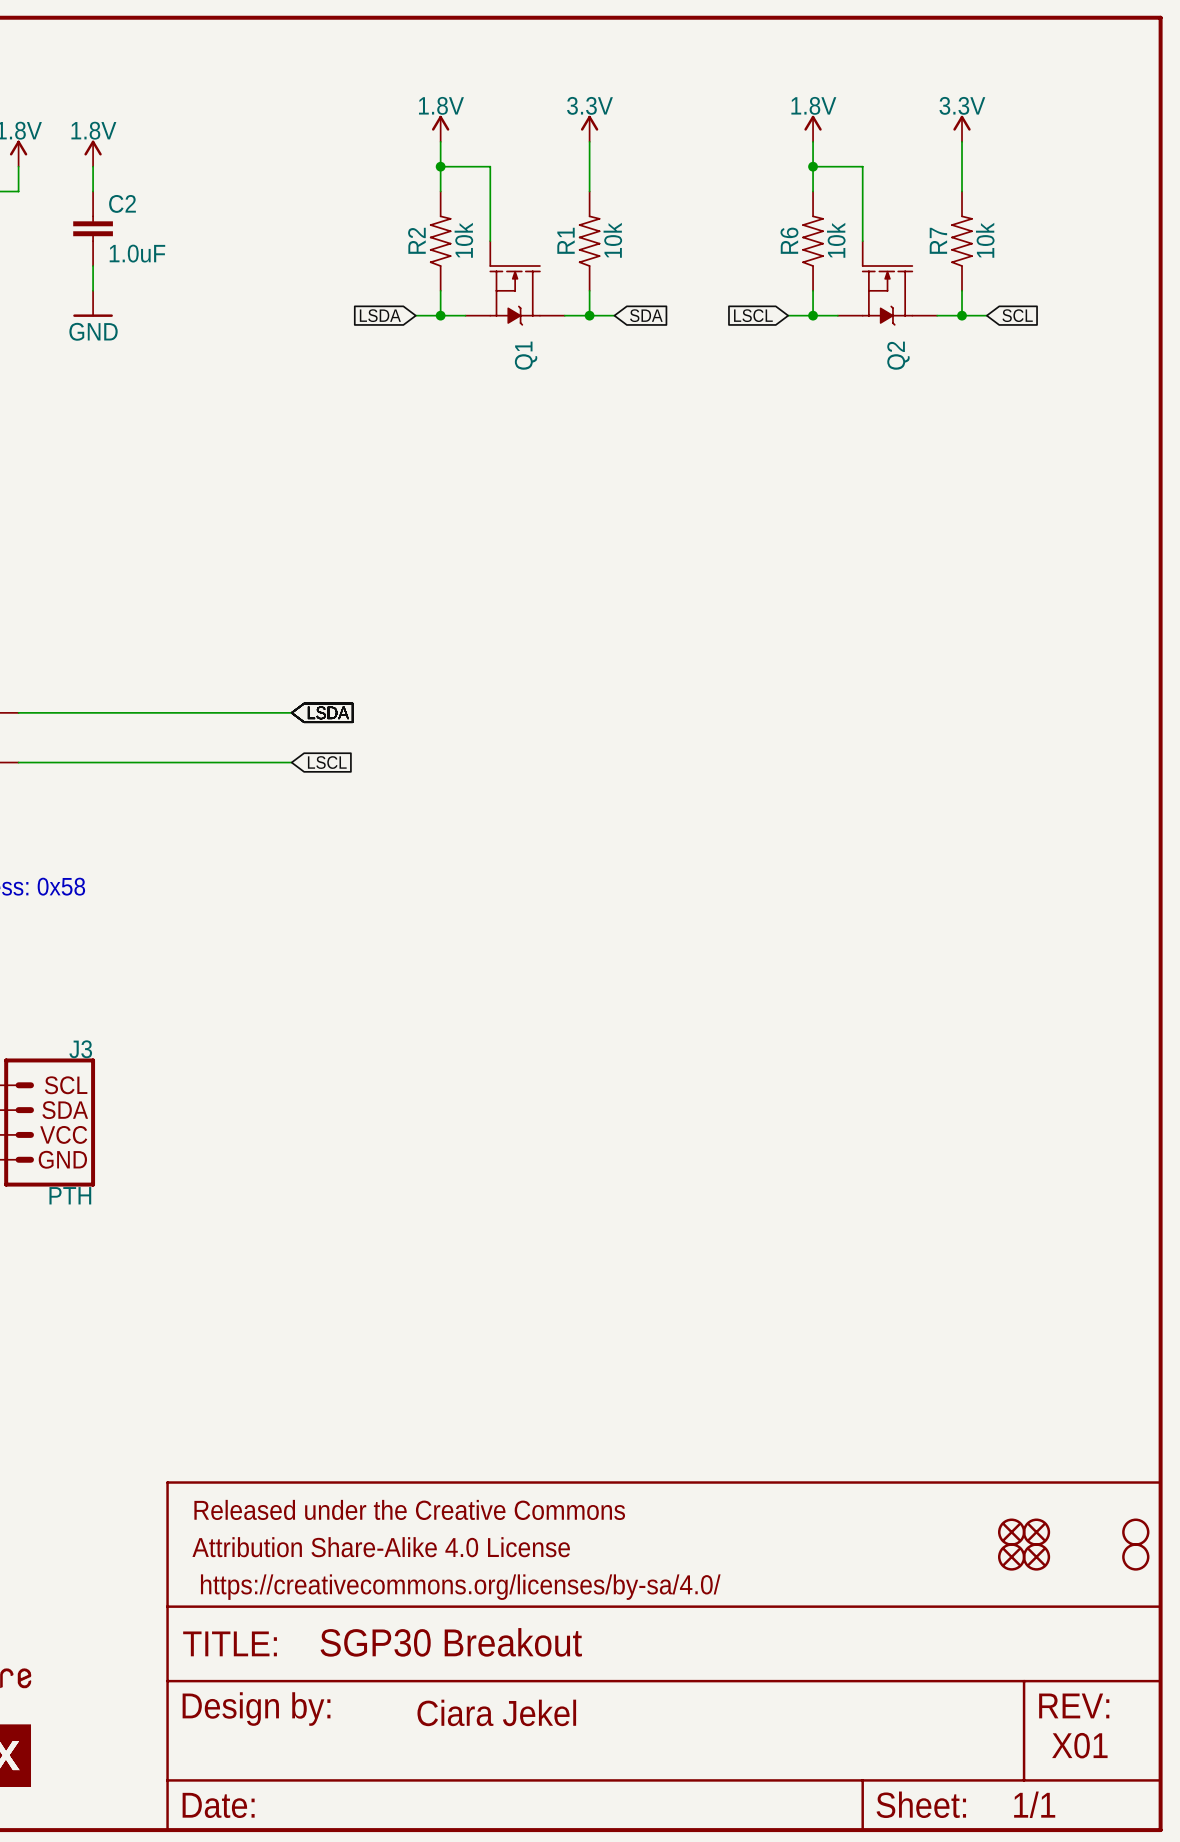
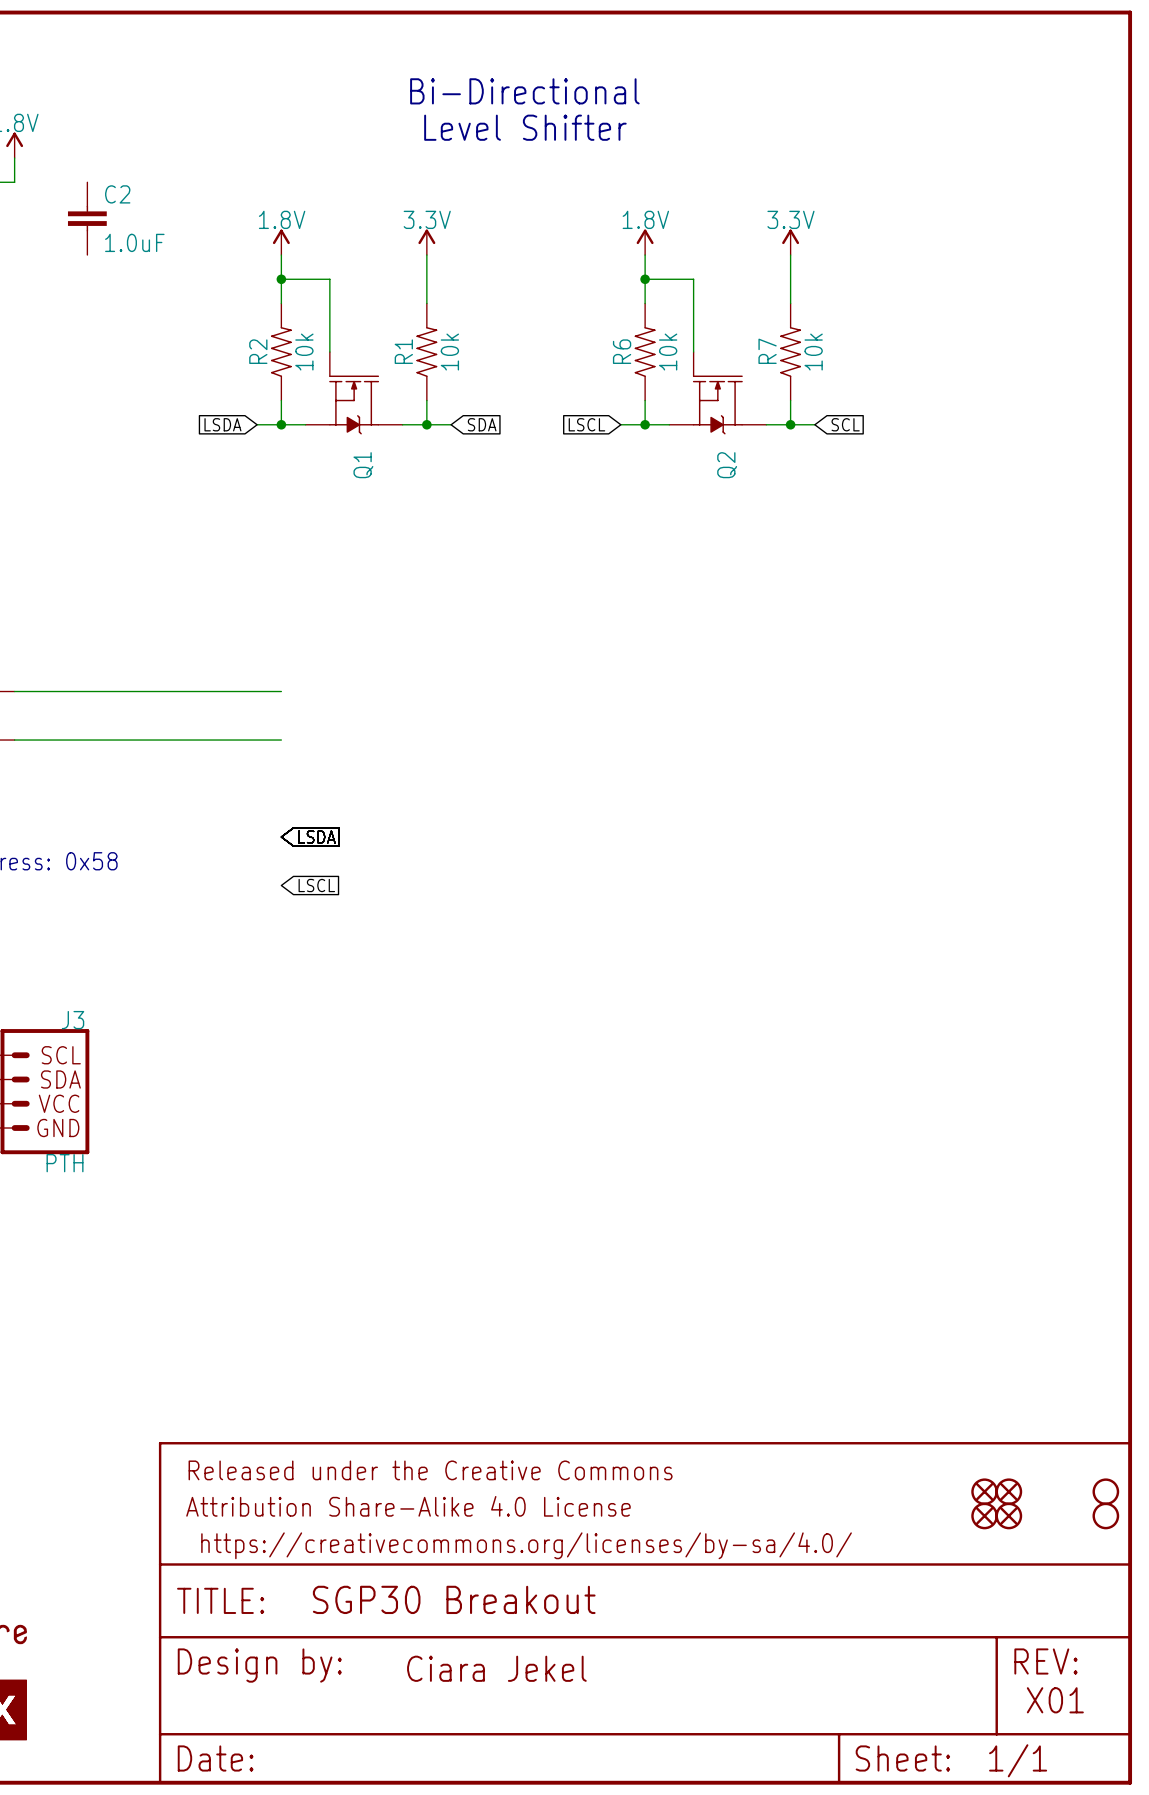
text: none -> Bi-Directional (524, 91)
power symbol: 1.8V (440, 128) -> none
power symbol: 3.3V (589, 128) -> none
power symbol: 1.8V (813, 128) -> none
power symbol: 3.3V (962, 128) -> none
text: none -> Level Shifter (525, 127)
wire: (440, 141) (440, 191) -> (281, 255) (281, 303)
wire: (589, 141) (589, 191) -> none
wire: (813, 141) (813, 191) -> (645, 255) (645, 303)
wire: (962, 141) (962, 191) -> none
power symbol: 1.8V (93, 153) -> none
wire: (93, 166) (93, 191) -> none
wire: (440, 166) (490, 166) (490, 241) -> (281, 279) (329, 279) (329, 352)
junction: (440, 166) -> none
wire: (813, 166) (862, 166) (862, 241) -> (645, 279) (693, 279) (693, 352)
junction: (813, 166) -> none
R2 position: (440, 241) -> (281, 352)
R1 position: (589, 241) -> (426, 352)
R6 position: (813, 241) -> (645, 352)
R7 position: (962, 241) -> (790, 352)
power symbol: none -> 1.8V (281, 242)
power symbol: none -> 3.3V (426, 242)
power symbol: none -> 1.8V (645, 242)
power symbol: none -> 3.3V (790, 242)
wire: (93, 266) (93, 290) -> none
Q1 position: (515, 283) -> (354, 393)
Q2 position: (887, 283) -> (717, 393)
junction: none -> (281, 279)
wire: (589, 290) (589, 315) -> (426, 400) (426, 424)
junction: none -> (645, 279)
wire: (962, 290) (962, 315) -> (790, 400) (790, 424)
power symbol: GND (93, 303) -> none
global label: LSDA (380, 315) -> none
wire: (415, 315) (465, 315) -> (257, 424) (305, 424)
junction: (440, 315) -> none
wire: (564, 315) (614, 315) -> (402, 424) (451, 424)
junction: (589, 315) -> none
global label position: SDA (646, 315) -> SDA (482, 424)
global label position: LSCL (753, 315) -> LSCL (586, 424)
wire: (788, 315) (837, 315) -> (620, 424) (669, 424)
junction: (813, 315) -> none
wire: (937, 315) (986, 315) -> (766, 424) (814, 424)
junction: (962, 315) -> none
global label position: SCL (1017, 315) -> SCL (845, 424)
wire: none -> (281, 400) (281, 424)
wire: none -> (645, 400) (645, 424)
global label: none -> LSDA (222, 424)
junction: none -> (281, 424)
junction: none -> (426, 424)
junction: none -> (645, 424)
junction: none -> (790, 424)
global label: LSDA (328, 712) -> none
global label position: LSCL (327, 762) -> LSCL (316, 885)
global label: none -> LSDA (317, 837)

